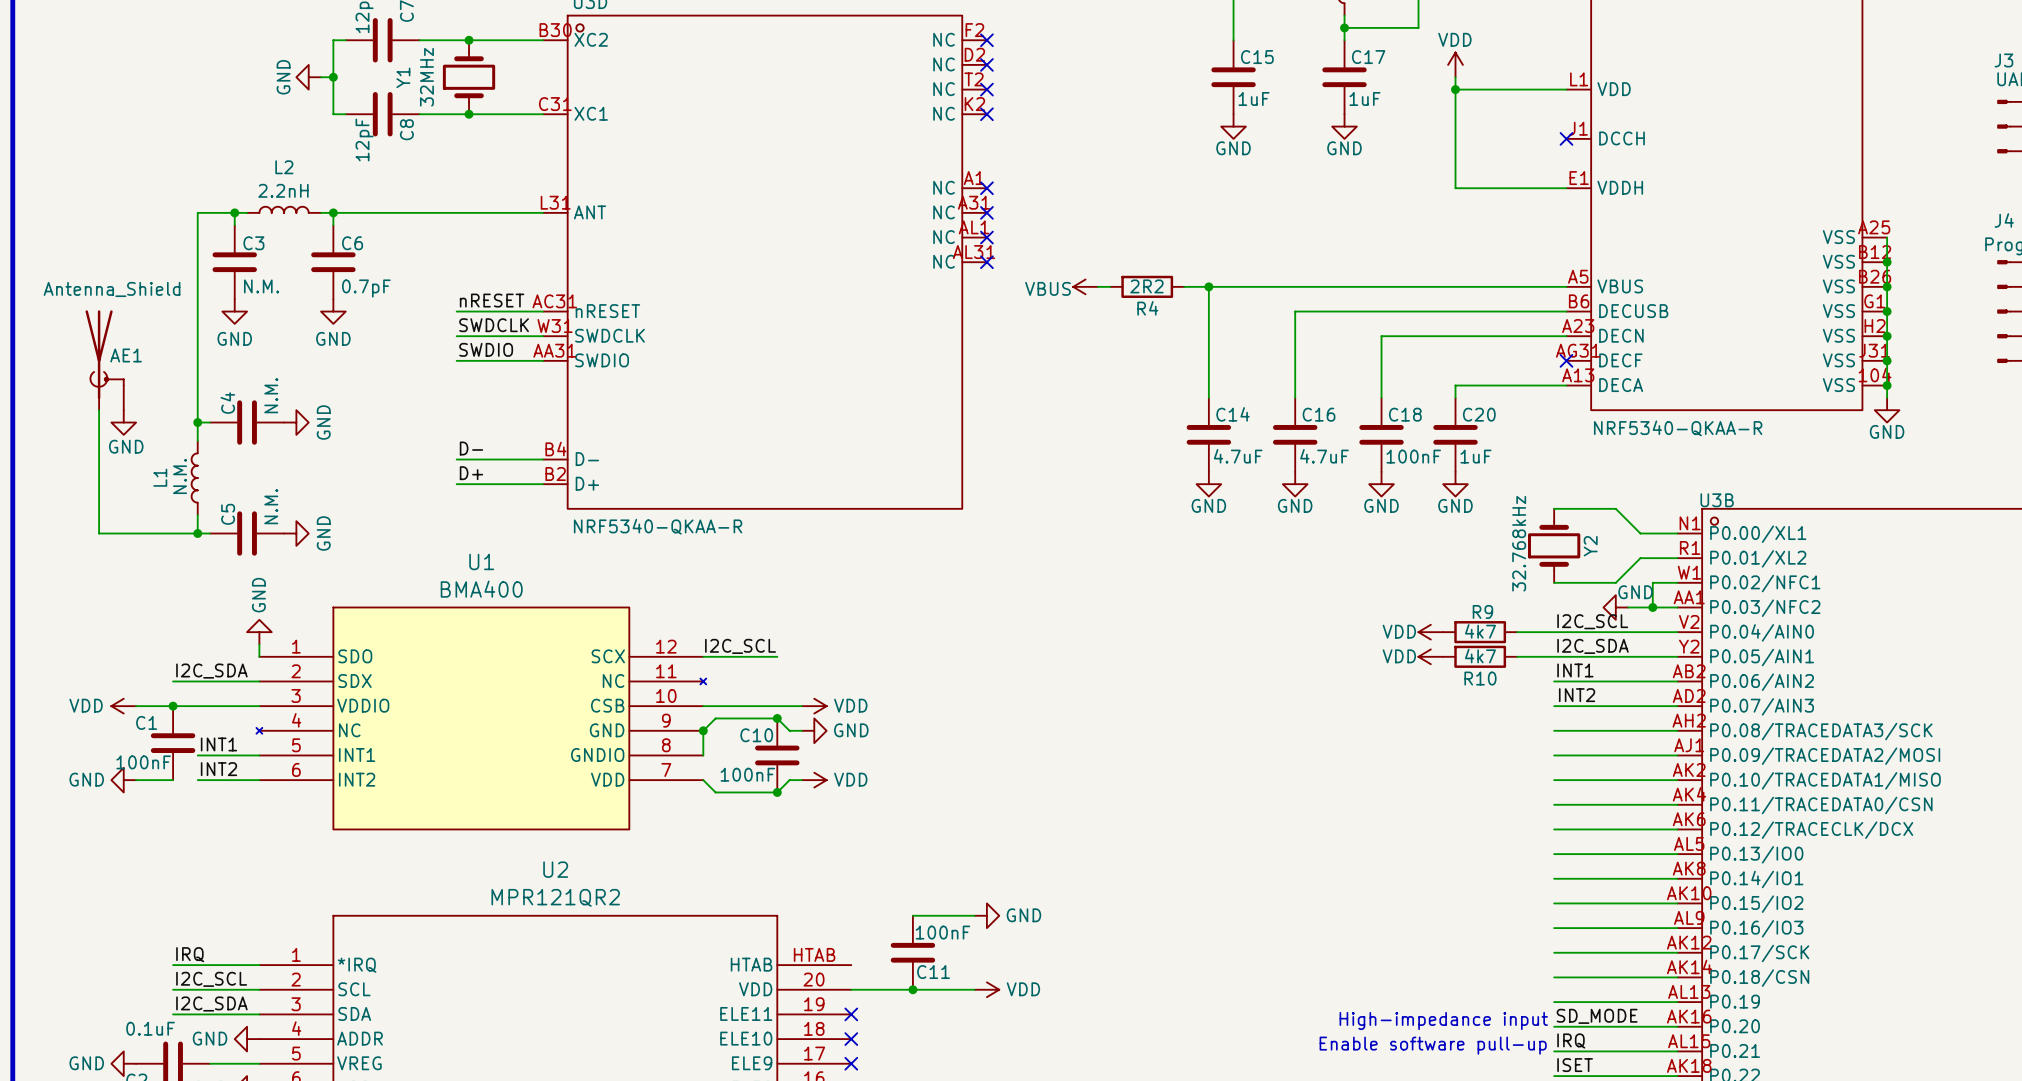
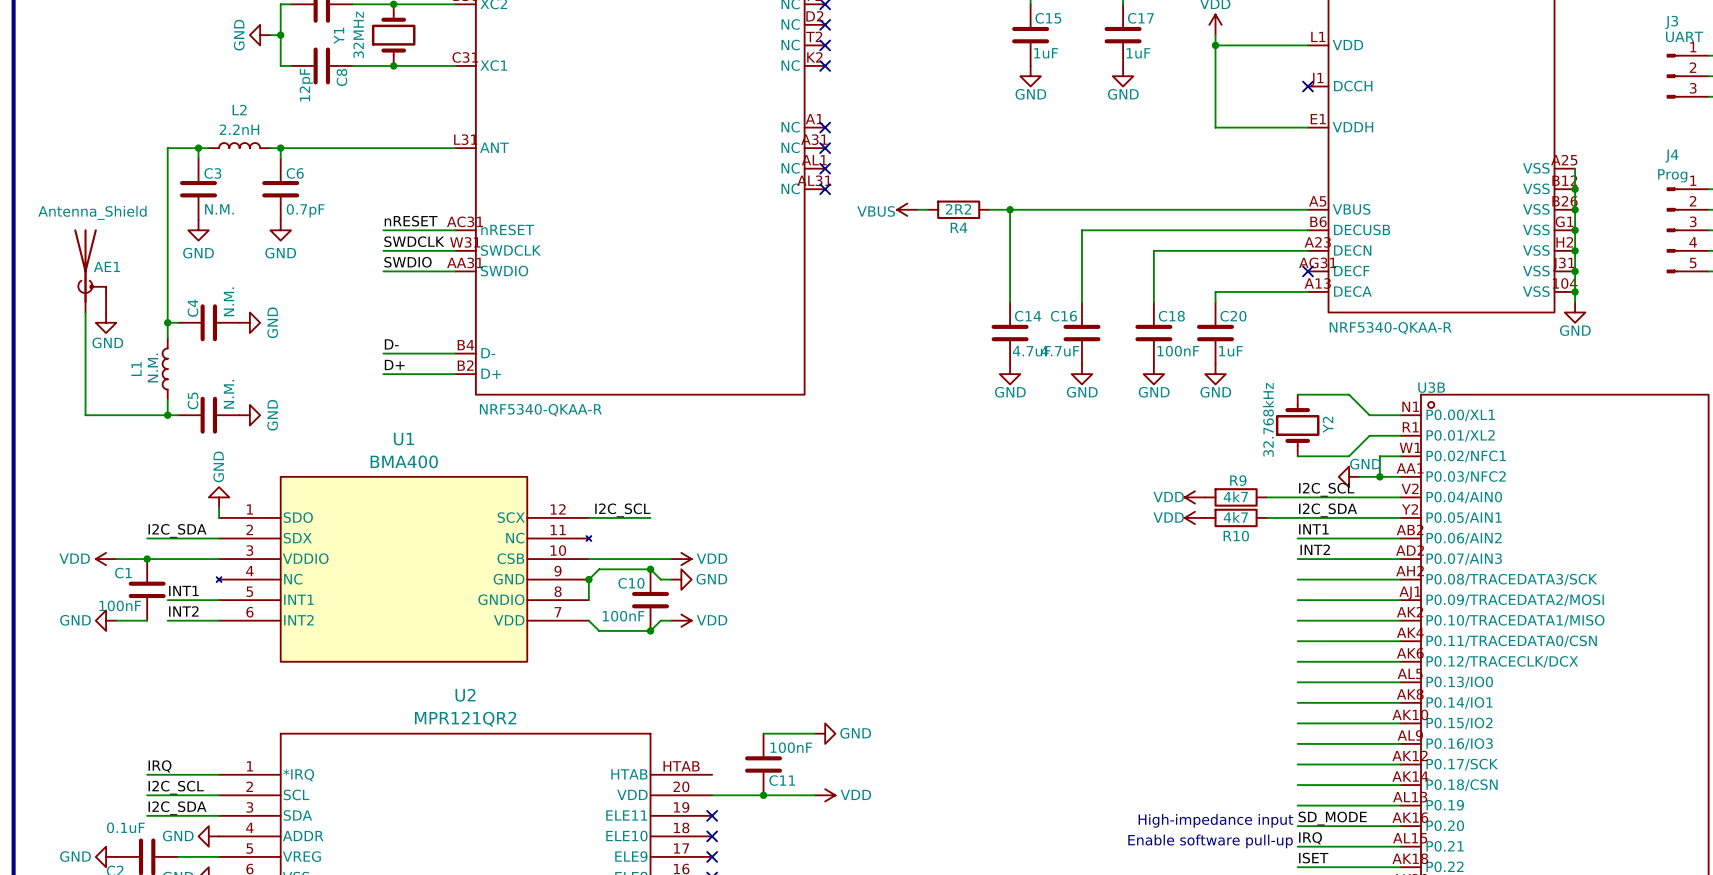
C16 name position: C16 (1319, 414) -> C16 (1063, 316)
C16 value position: 4.7uF (1324, 456) -> 4.7uF (1060, 351)

